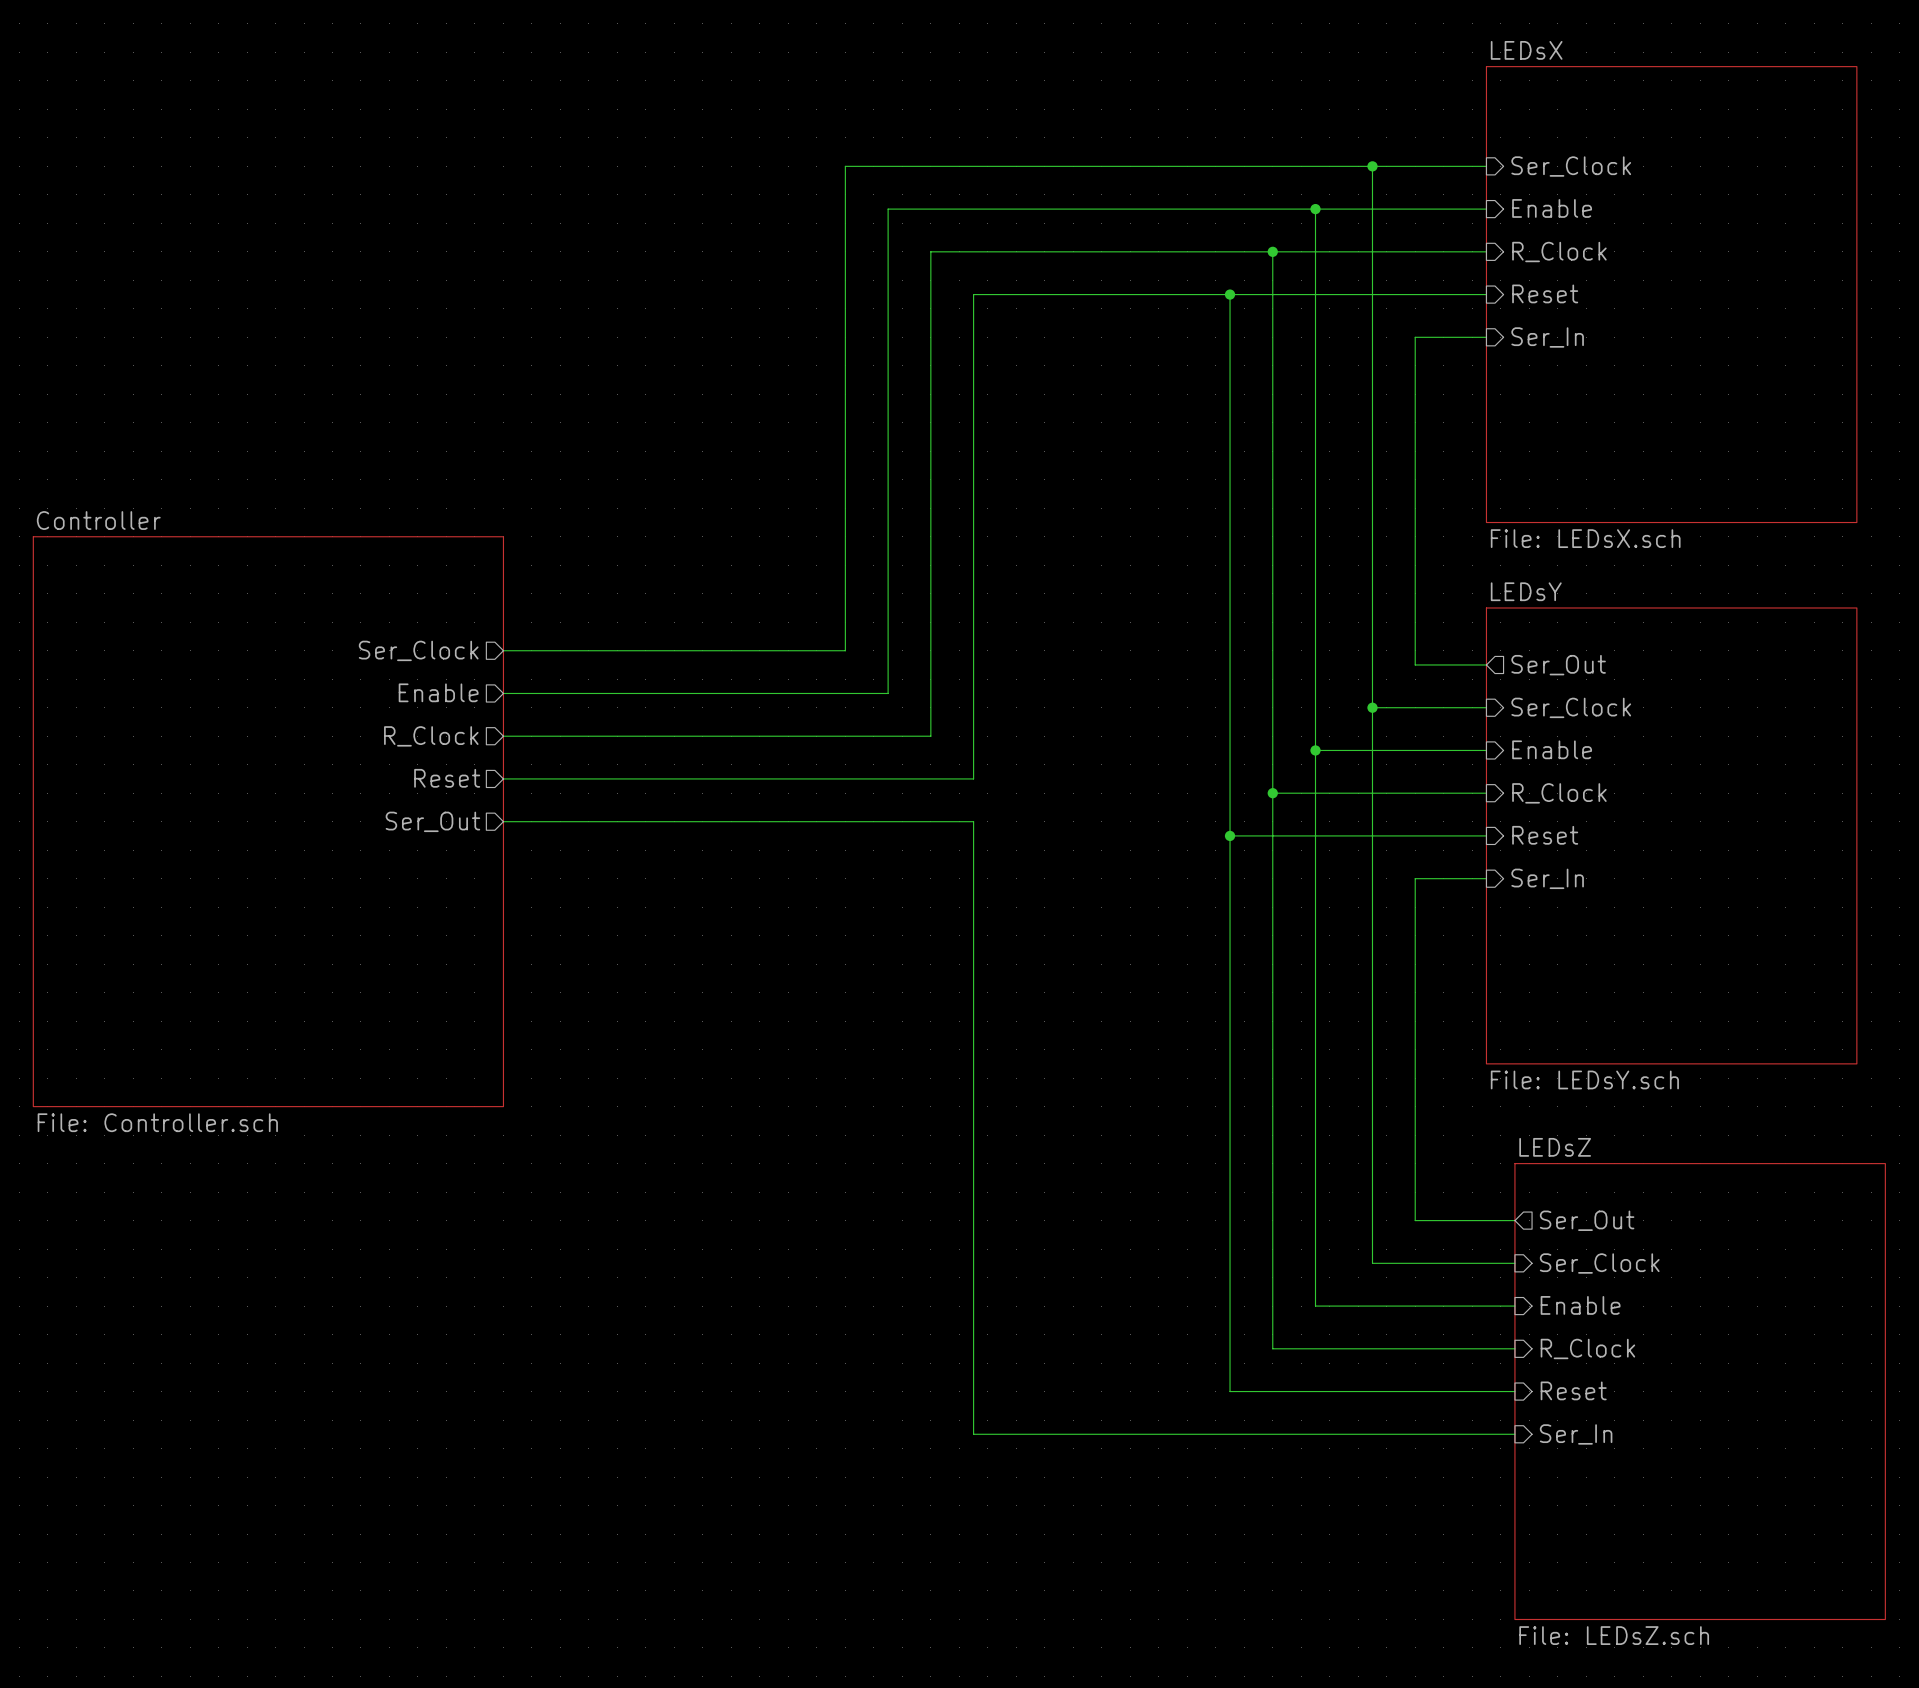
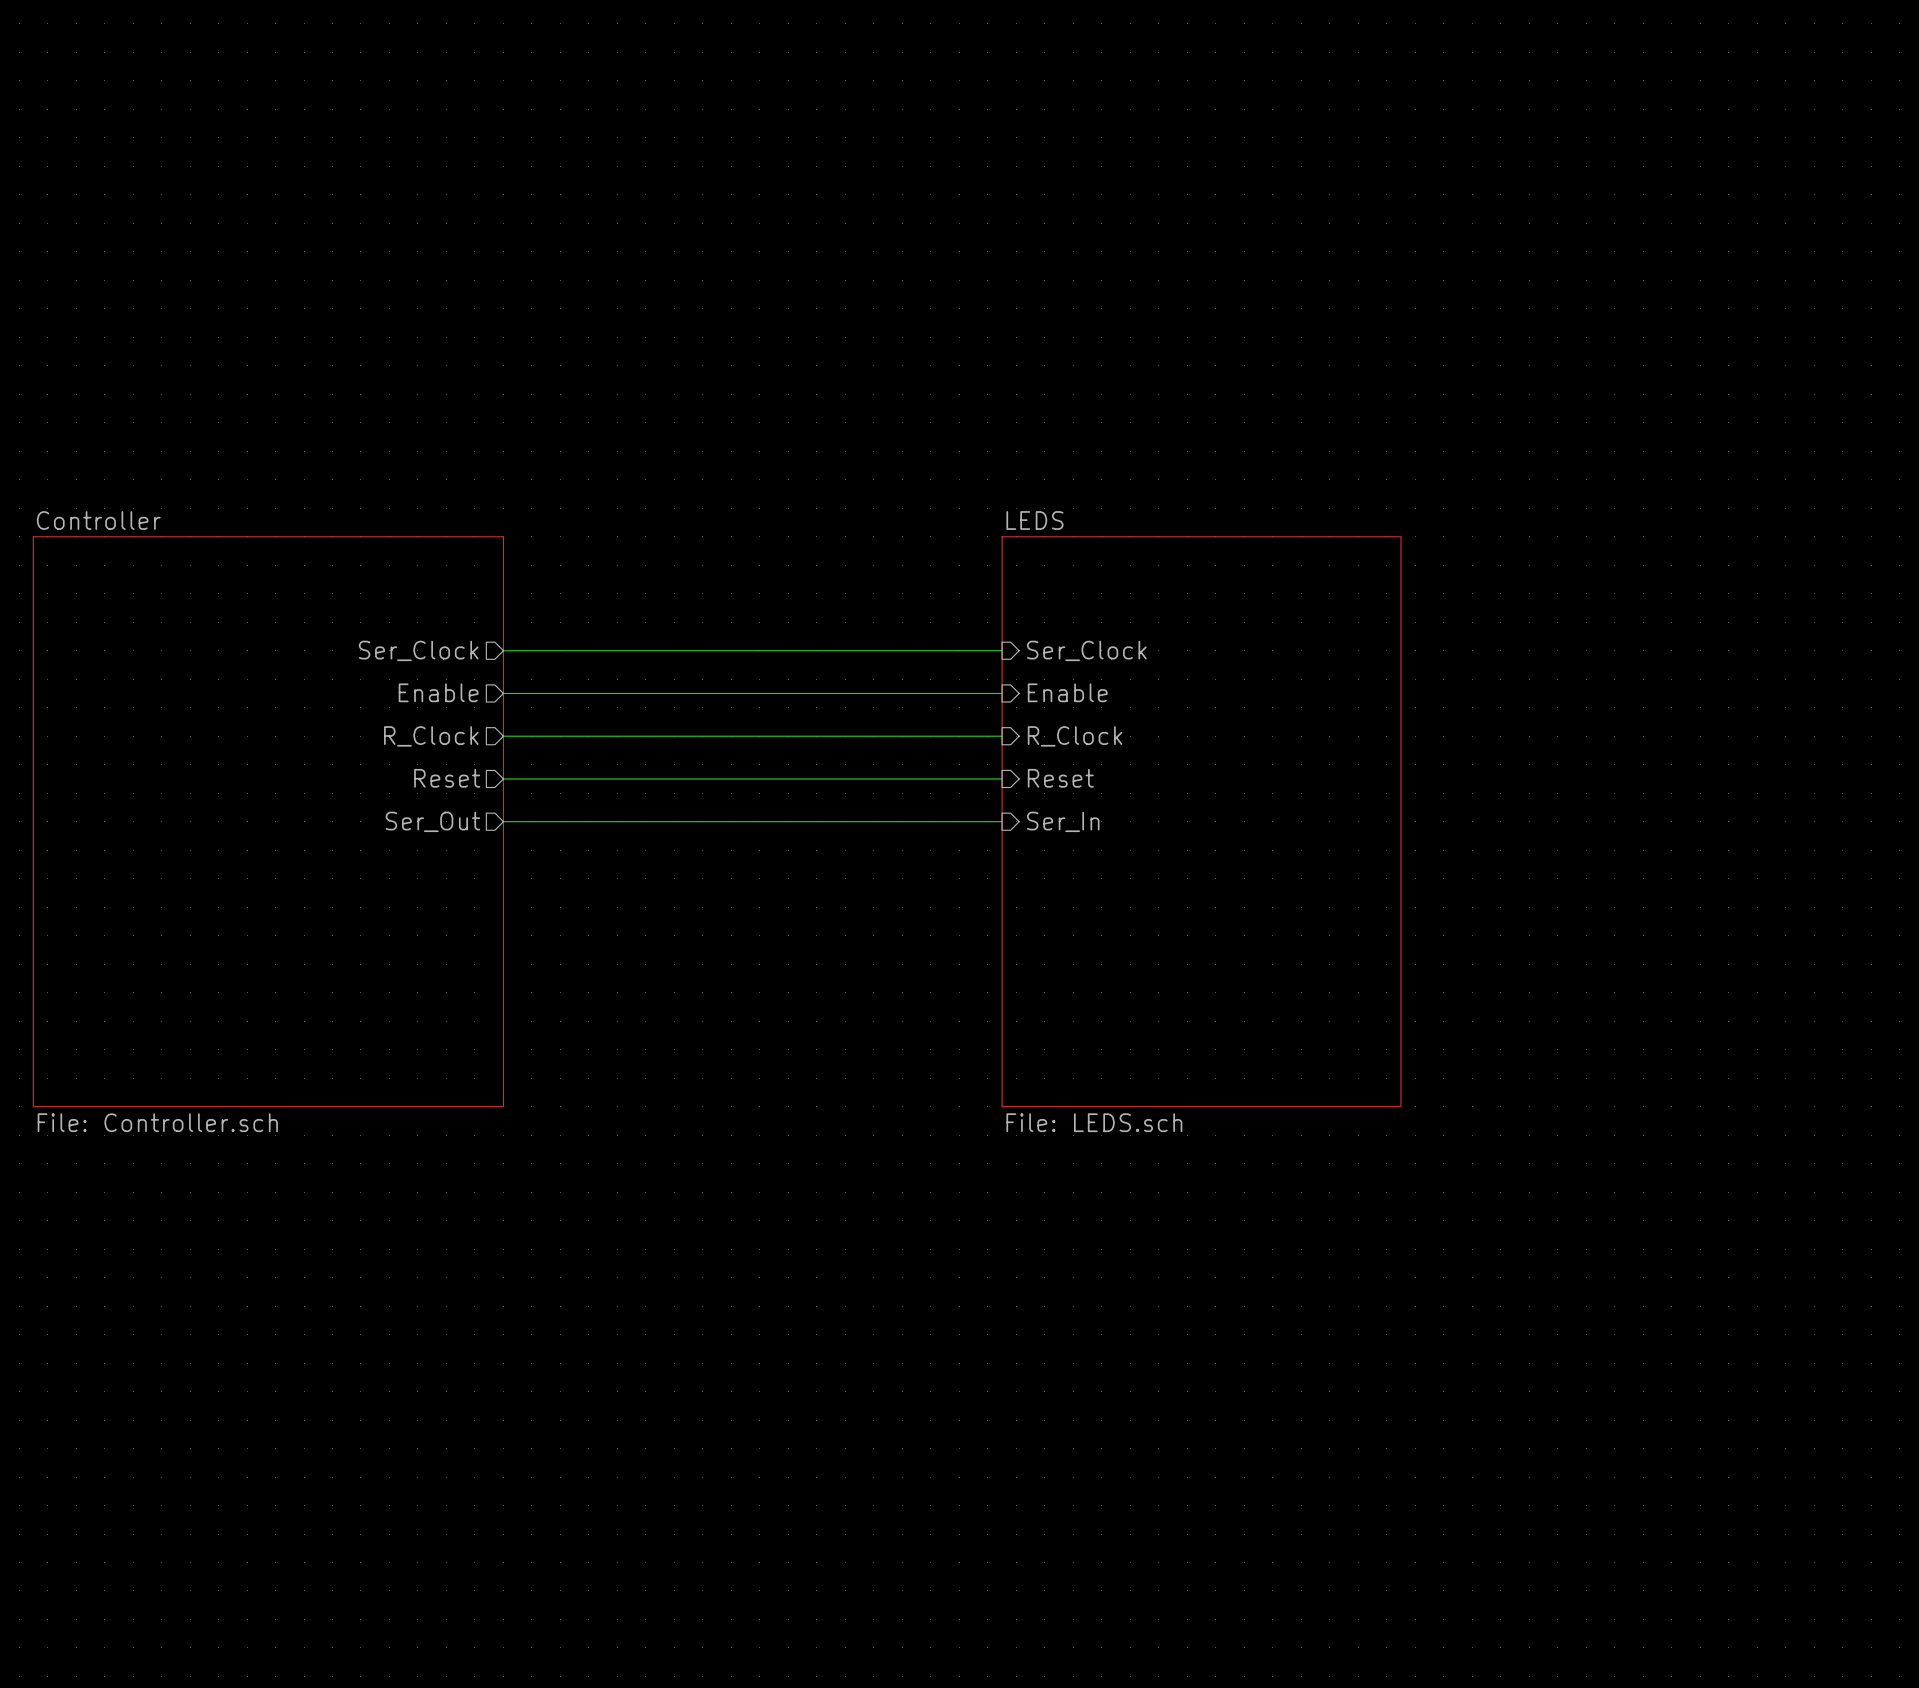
wire: (1372, 166) (1372, 1263) (1514, 1263) -> none
junction: (1372, 166) -> none
wire: (1486, 166) (845, 166) (845, 650) -> (1002, 650) (845, 650)
sheet pin: Ser_Clock (1571, 166) -> none
sheet pin: Enable (1552, 208) -> none
wire: (1315, 209) (1315, 1306) (1514, 1306) -> none
junction: (1315, 209) -> none
wire: (1486, 209) (888, 209) (888, 693) -> (1002, 693) (888, 693)
wire: (1272, 251) (1272, 1348) (1514, 1348) -> none
junction: (1272, 251) -> none
wire: (1486, 251) (930, 251) (930, 736) -> (1002, 736) (930, 736)
sheet pin: R_Clock (1559, 252) -> none
sheet pin: Reset (1545, 293) -> none
wire: (1230, 294) (1230, 1391) (1514, 1391) -> none
junction: (1230, 294) -> none
wire: (1486, 294) (973, 294) (973, 778) -> (1002, 778) (973, 778)
sheet LEDsX: File: LEDsX.sch (1671, 294) -> none
wire: (1486, 337) (1415, 337) (1415, 664) (1486, 664) -> none
sheet pin: Ser_In (1547, 337) -> none
sheet pin: none -> Ser_Clock (1086, 650)
sheet pin: Ser_Out (1558, 665) -> none
sheet pin: none -> Enable (1067, 692)
wire: (1372, 707) (1486, 707) -> none
junction: (1372, 707) -> none
sheet pin: Ser_Clock (1571, 707) -> none
sheet pin: none -> R_Clock (1075, 736)
sheet pin: Enable (1552, 749) -> none
wire: (1315, 750) (1486, 750) -> none
junction: (1315, 750) -> none
sheet pin: none -> Reset (1060, 778)
wire: (1272, 793) (1486, 793) -> none
junction: (1272, 793) -> none
sheet pin: R_Clock (1559, 793) -> none
wire: (973, 821) (973, 1434) (1514, 1434) -> (973, 821) (1002, 821)
sheet pin: none -> Ser_In (1063, 821)
sheet LEDS: none -> File: LEDS.sch (1201, 821)
wire: (1230, 835) (1486, 835) -> none
junction: (1230, 835) -> none
sheet pin: Reset (1545, 835) -> none
sheet LEDsY: File: LEDsY.sch (1671, 835) -> none
wire: (1486, 878) (1415, 878) (1415, 1220) (1514, 1220) -> none
sheet pin: Ser_In (1547, 878) -> none
sheet pin: Ser_Out (1587, 1220) -> none
sheet pin: Ser_Clock (1599, 1263) -> none
sheet pin: Enable (1580, 1305) -> none
sheet pin: R_Clock (1587, 1348) -> none
sheet pin: Reset (1573, 1390) -> none
sheet LEDsZ: File: LEDsZ.sch (1700, 1391) -> none
sheet pin: Ser_In (1576, 1434) -> none

